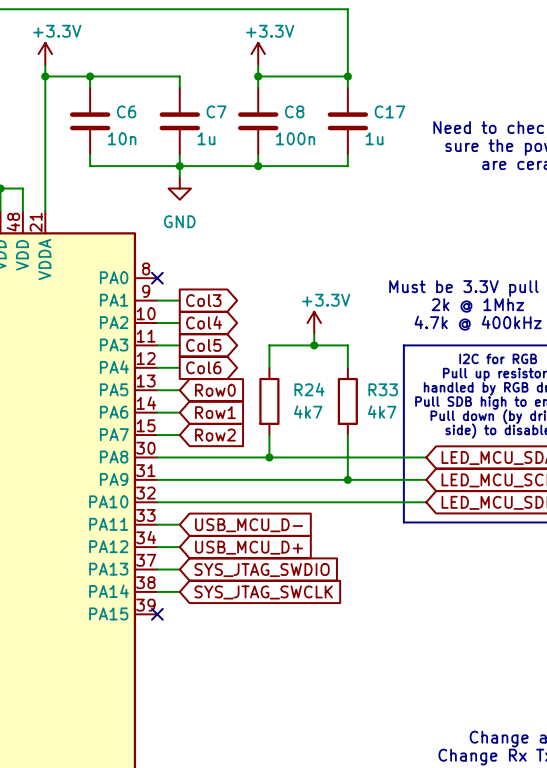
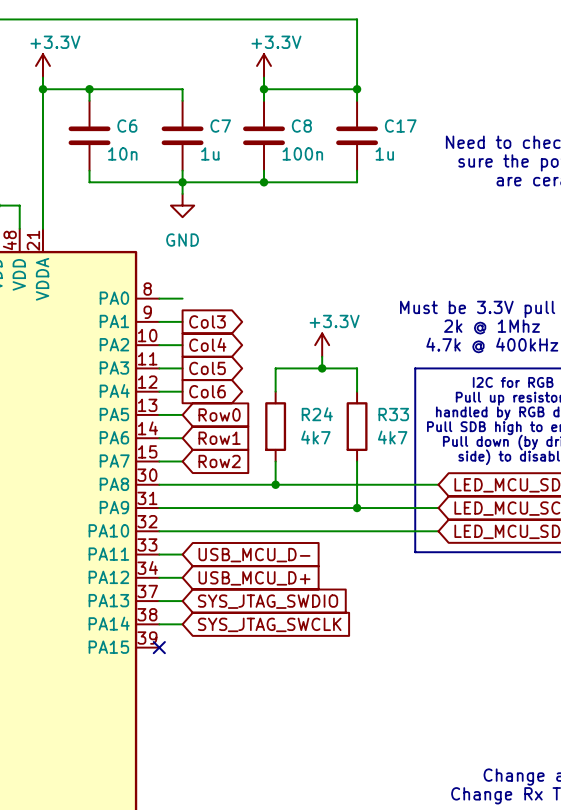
wire: none -> (159, 298) (182, 298)
no-connect mark: (157, 278) -> none

